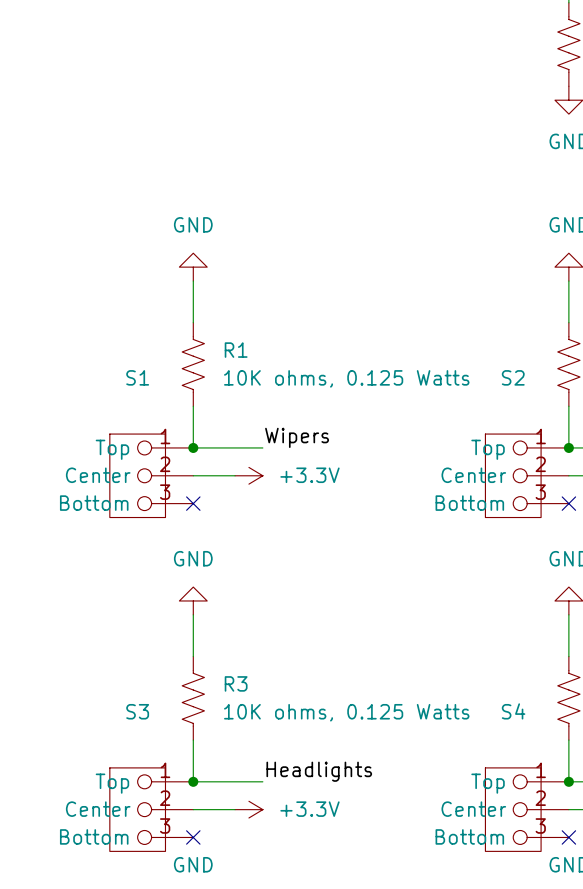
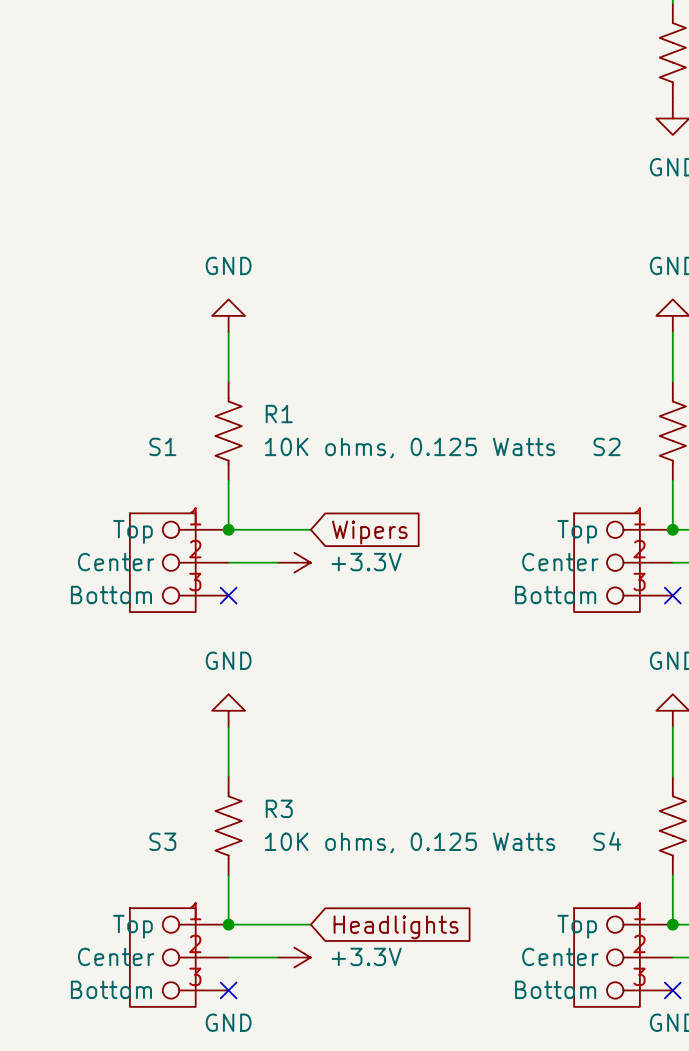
label: Wipers (297, 437) -> none
global label: none -> Wipers (369, 532)
label: Headlights (319, 771) -> none
global label: none -> Headlights (396, 927)

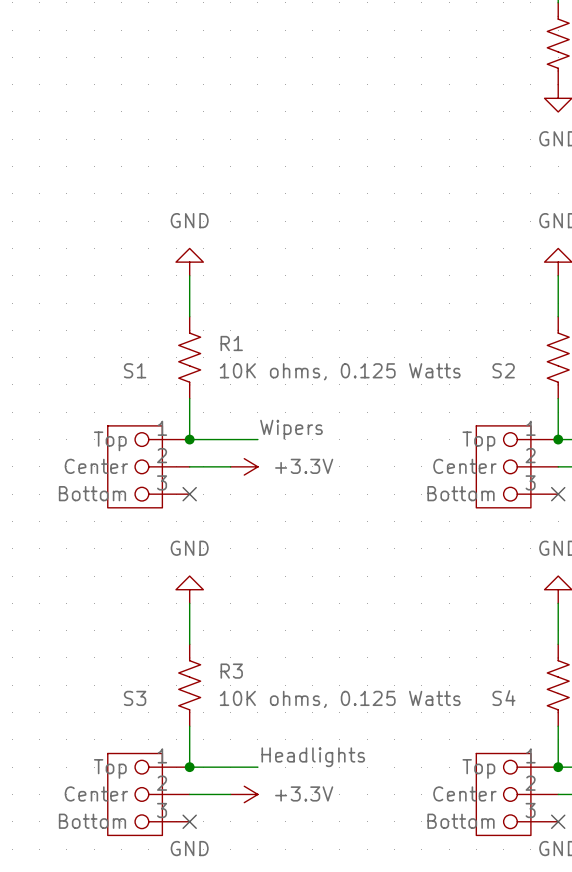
label: none -> Wipers (291, 429)
global label: Wipers (369, 532) -> none
label: none -> Headlights (313, 757)
global label: Headlights (396, 927) -> none

